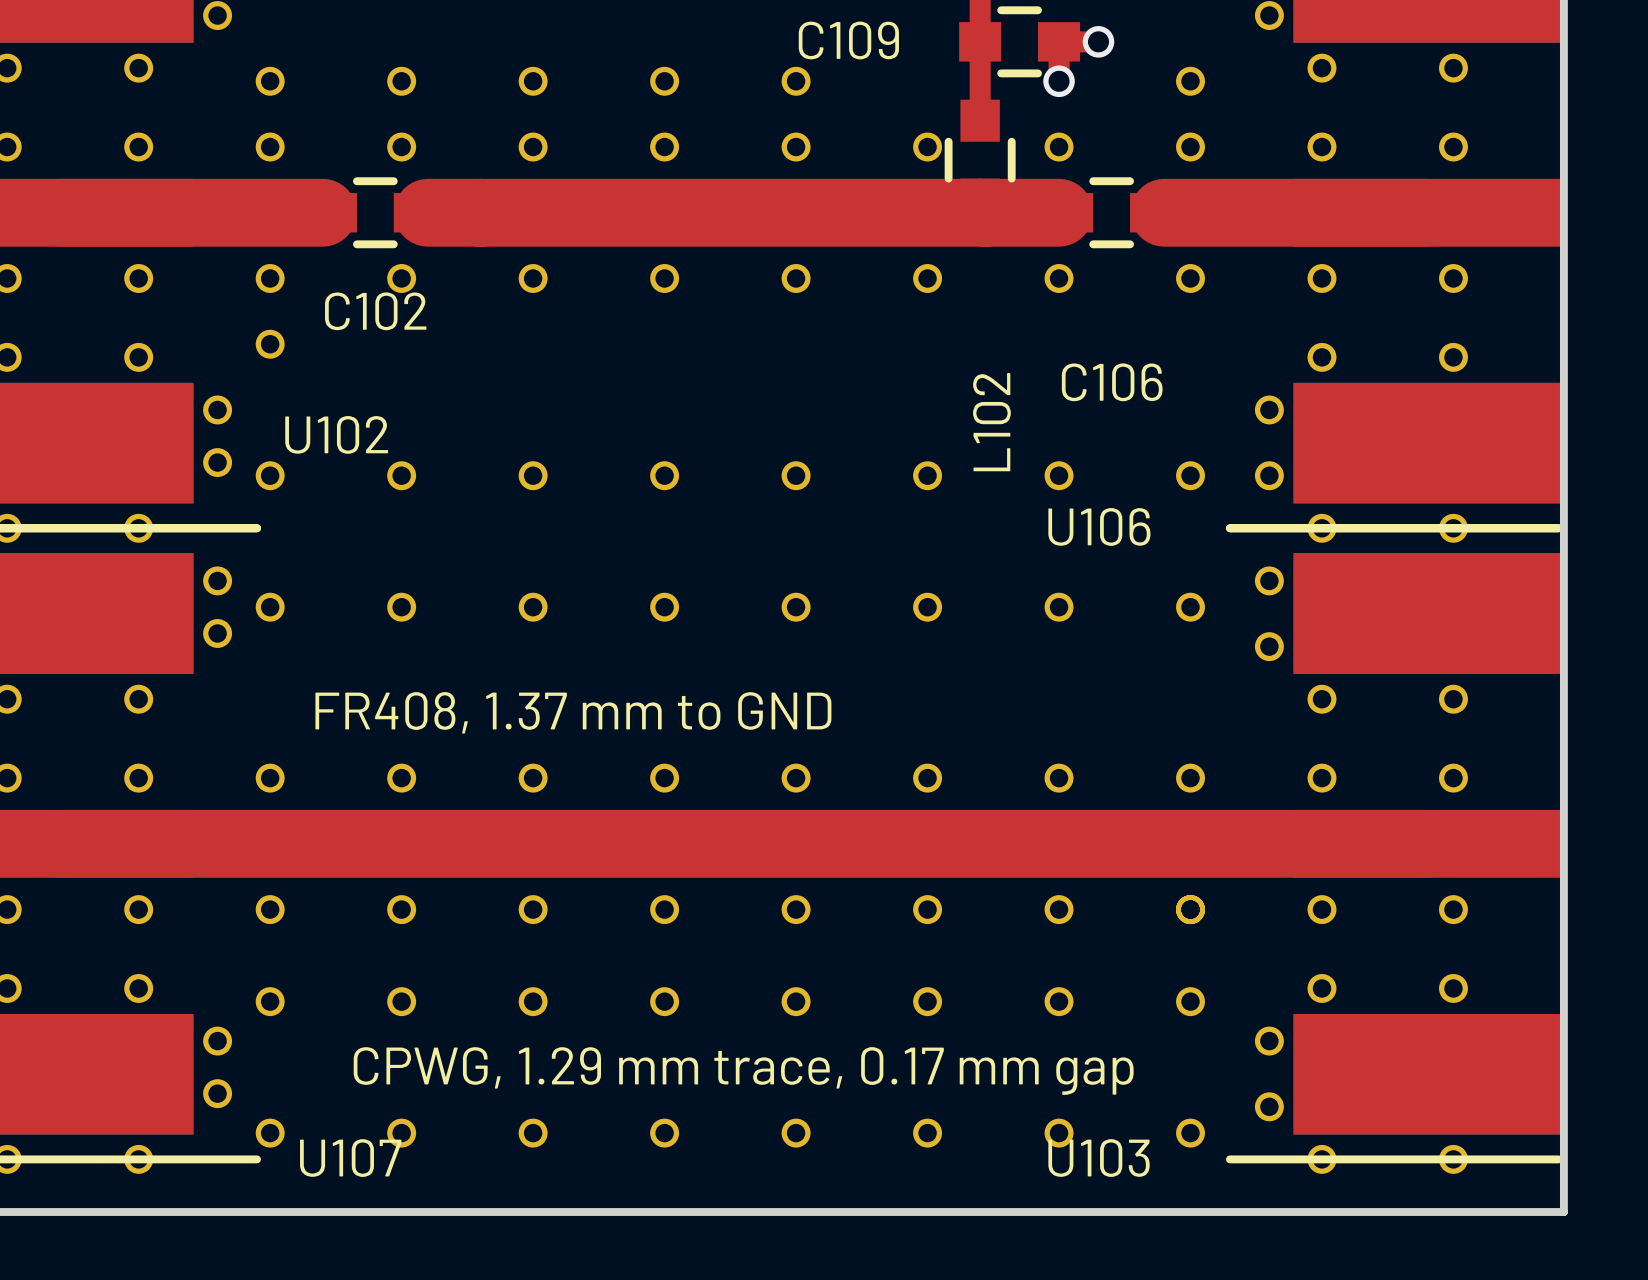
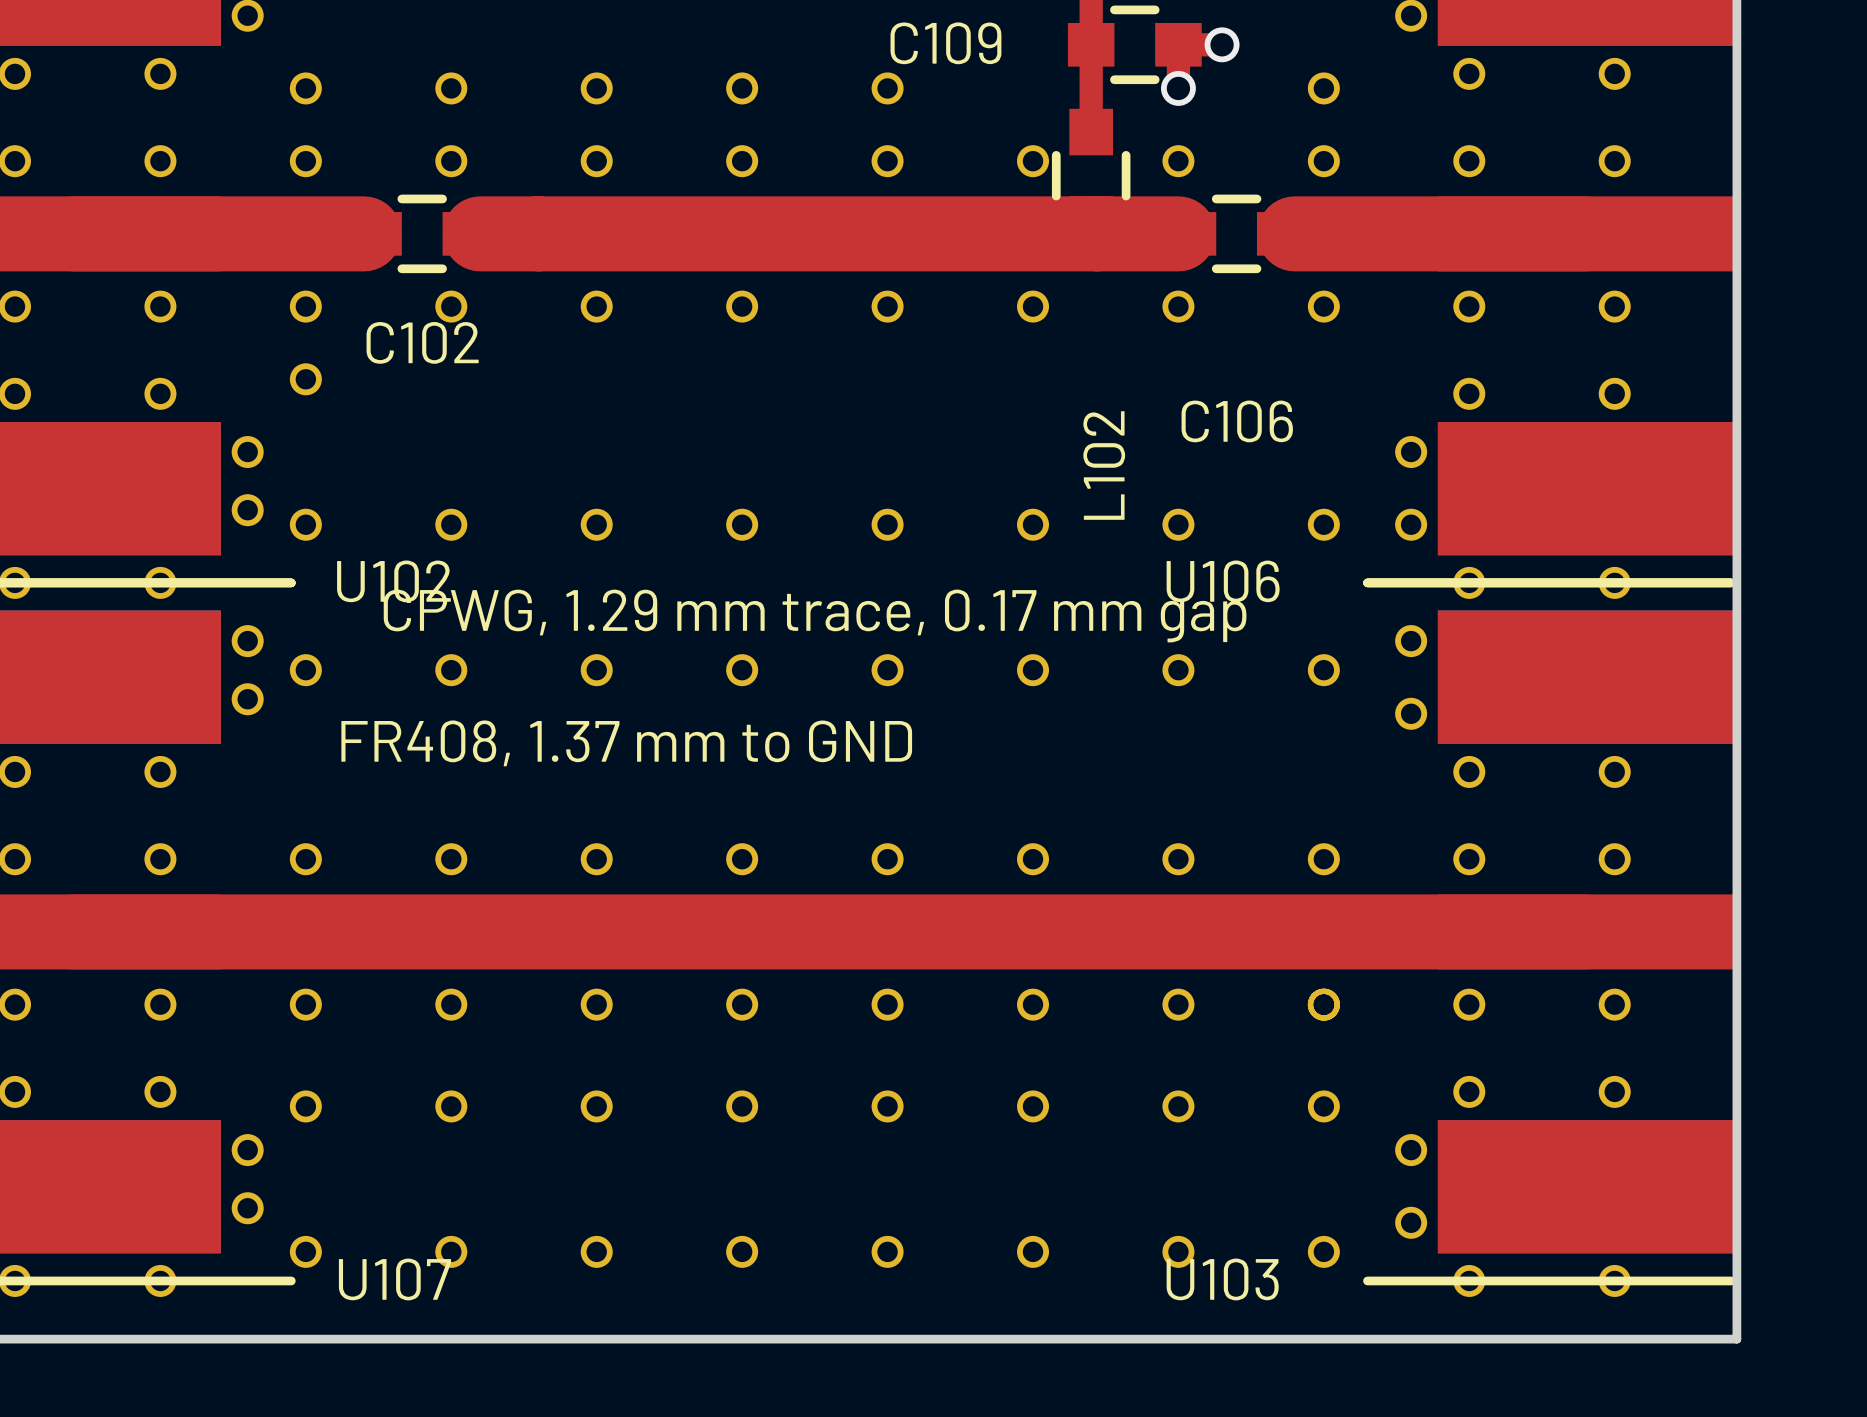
U102 name position: U102 (336, 434) -> U102 (393, 581)
text position: FR408, 1.37 mm to GND (573, 712) -> FR408, 1.37 mm to GND (626, 743)
text position: CPWG, 1.29 mm trace, 0.17 mm gap (743, 1070) -> CPWG, 1.29 mm trace, 0.17 mm gap (815, 615)

